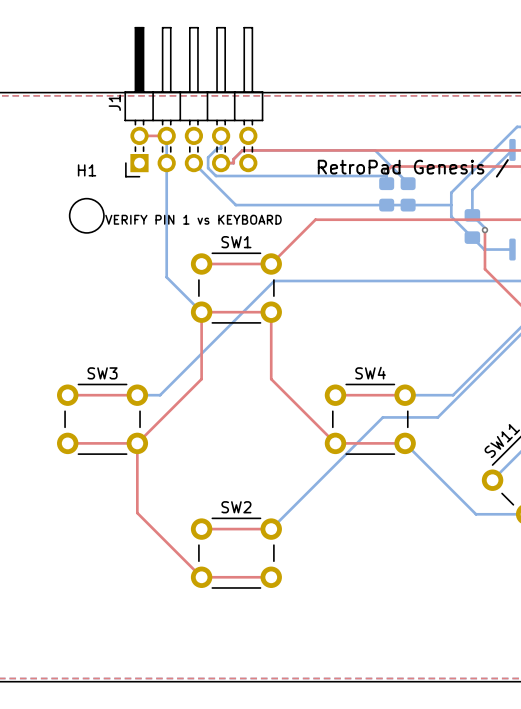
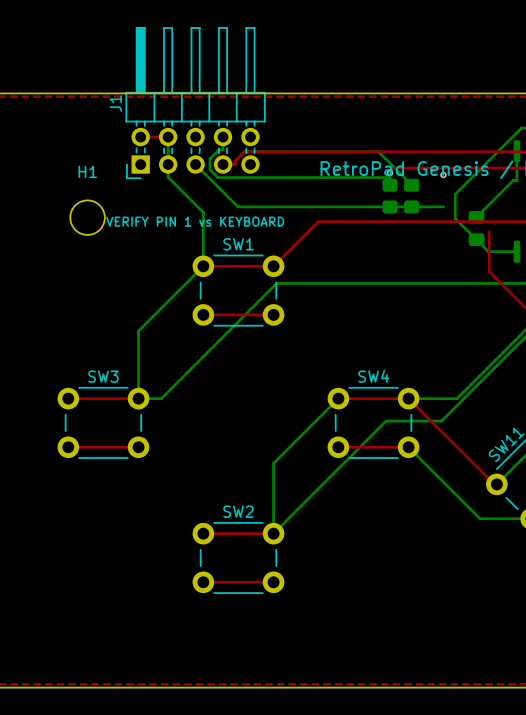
bottom track: (512, 149) (472, 190) (472, 215) (484, 230) -> (516, 151) (516, 180) (513, 180) (476, 217)
via: none -> (443, 174)
bottom track: (166, 175) (166, 277) (201, 312) -> (168, 177) (203, 212) (203, 266) (138, 331) (138, 398)
bottom track: (439, 205) (451, 205) -> none
via: (484, 230) -> none
top track: (201, 312) (201, 379) (137, 443) (137, 513) (201, 577) -> none
top track: (271, 312) (271, 379) (335, 443) -> none
bottom track: none -> (338, 398) (273, 463) (273, 533)
top track: none -> (408, 398) (494, 484) (496, 484)

